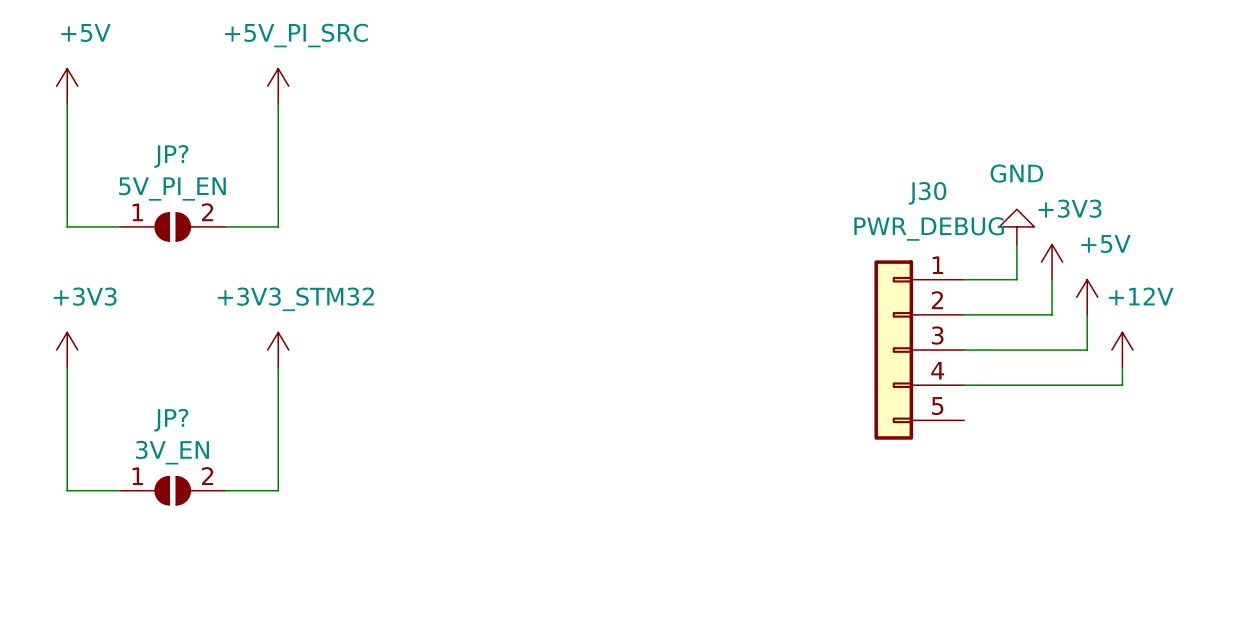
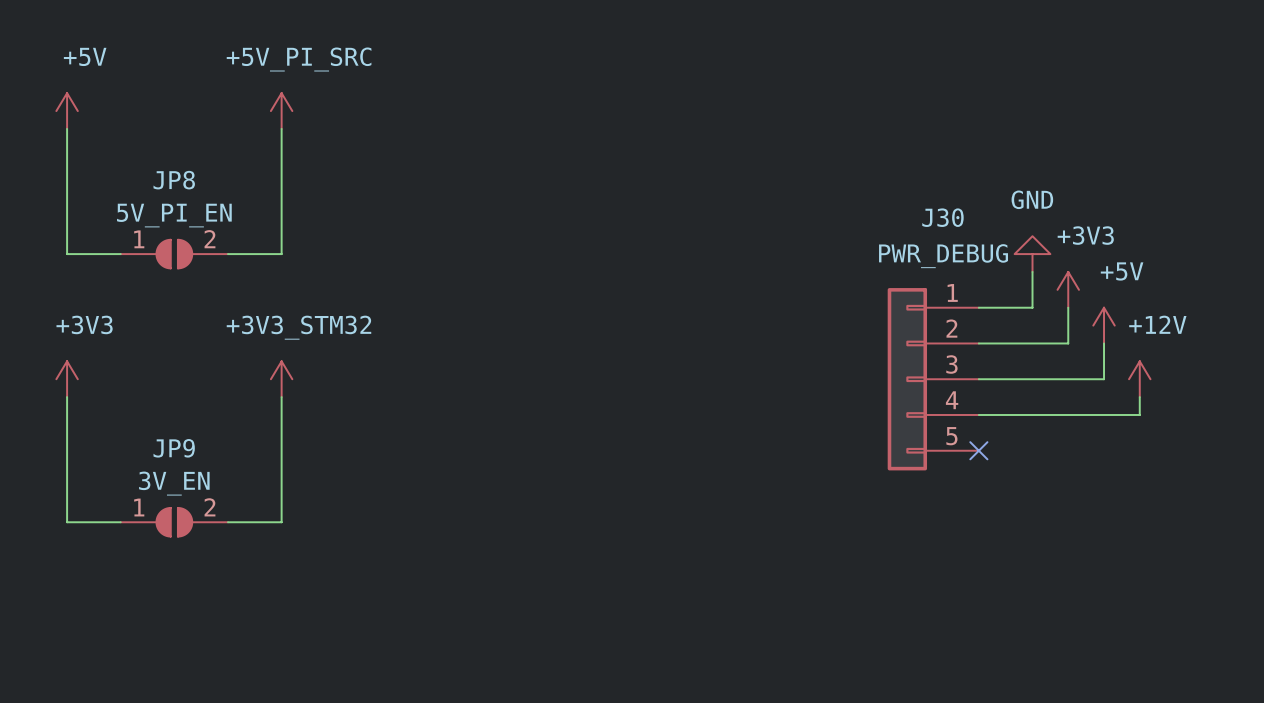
JP? name: JP? (171, 156) -> JP8 (174, 180)
JP? name: JP? (171, 420) -> JP9 (174, 448)
no-connect mark: none -> (978, 450)

